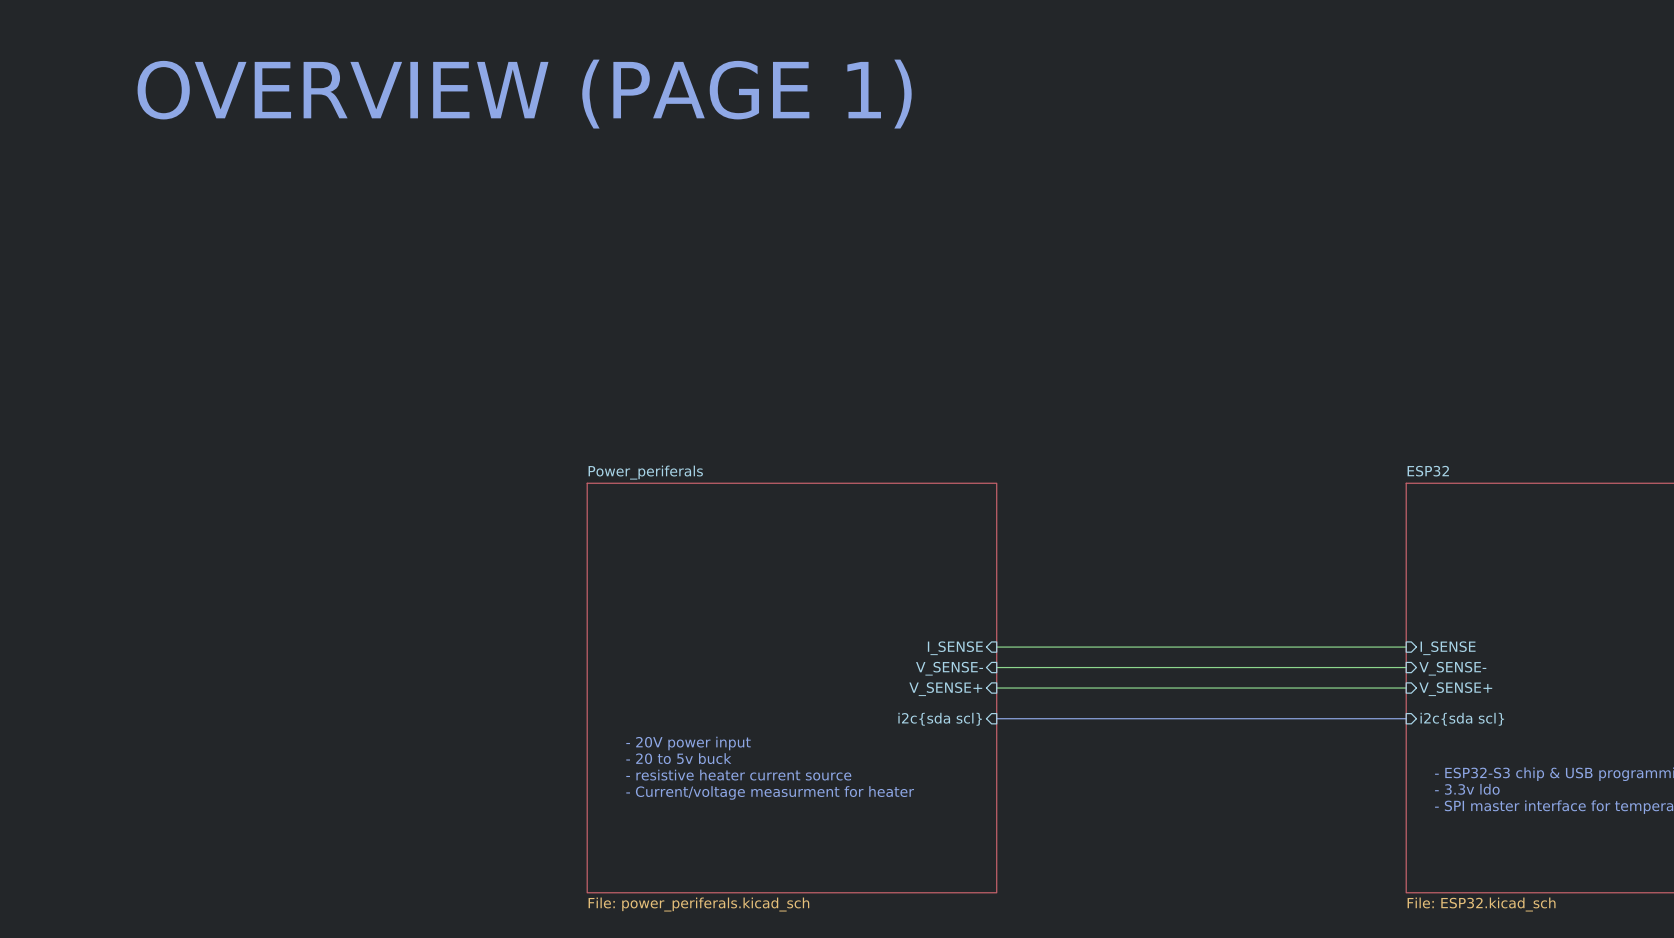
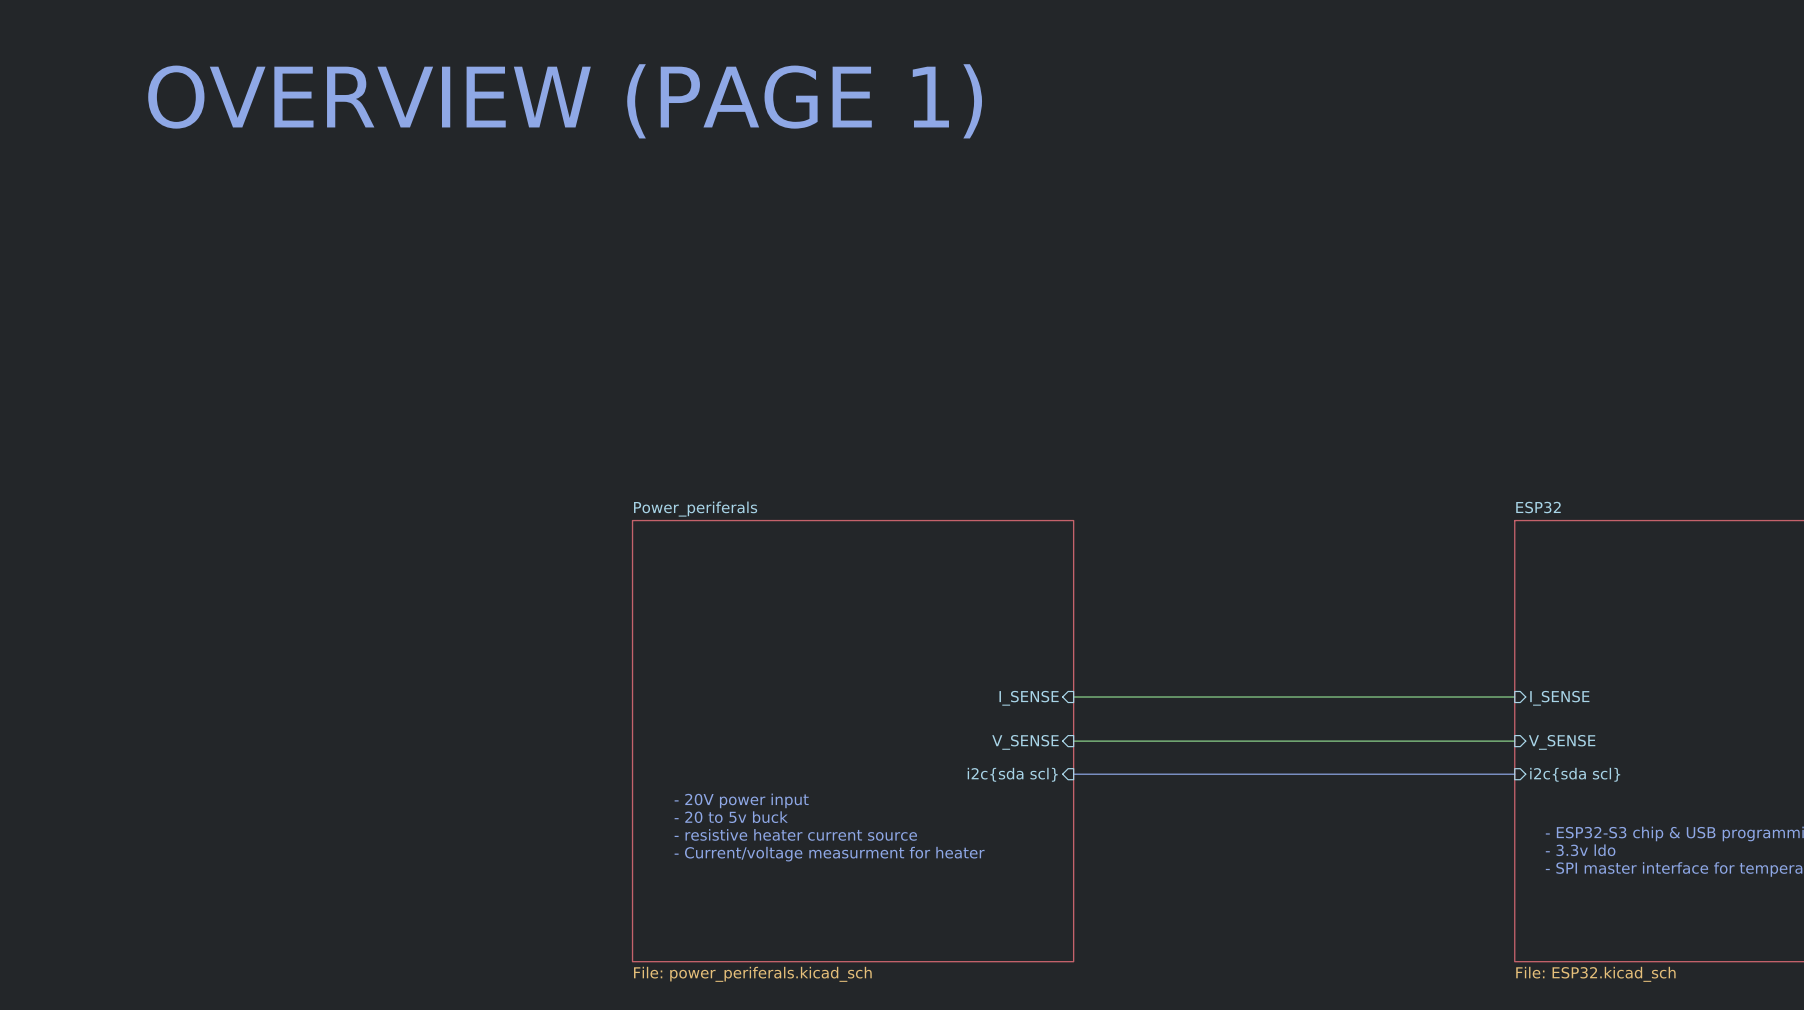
wire: (996, 667) (1406, 667) -> none
sheet pin: V_SENSE- (949, 668) -> none
sheet pin: V_SENSE- (1452, 668) -> none
sheet pin: V_SENSE+ (945, 689) -> V_SENSE (1025, 742)
sheet pin: V_SENSE+ (1455, 689) -> V_SENSE (1562, 742)

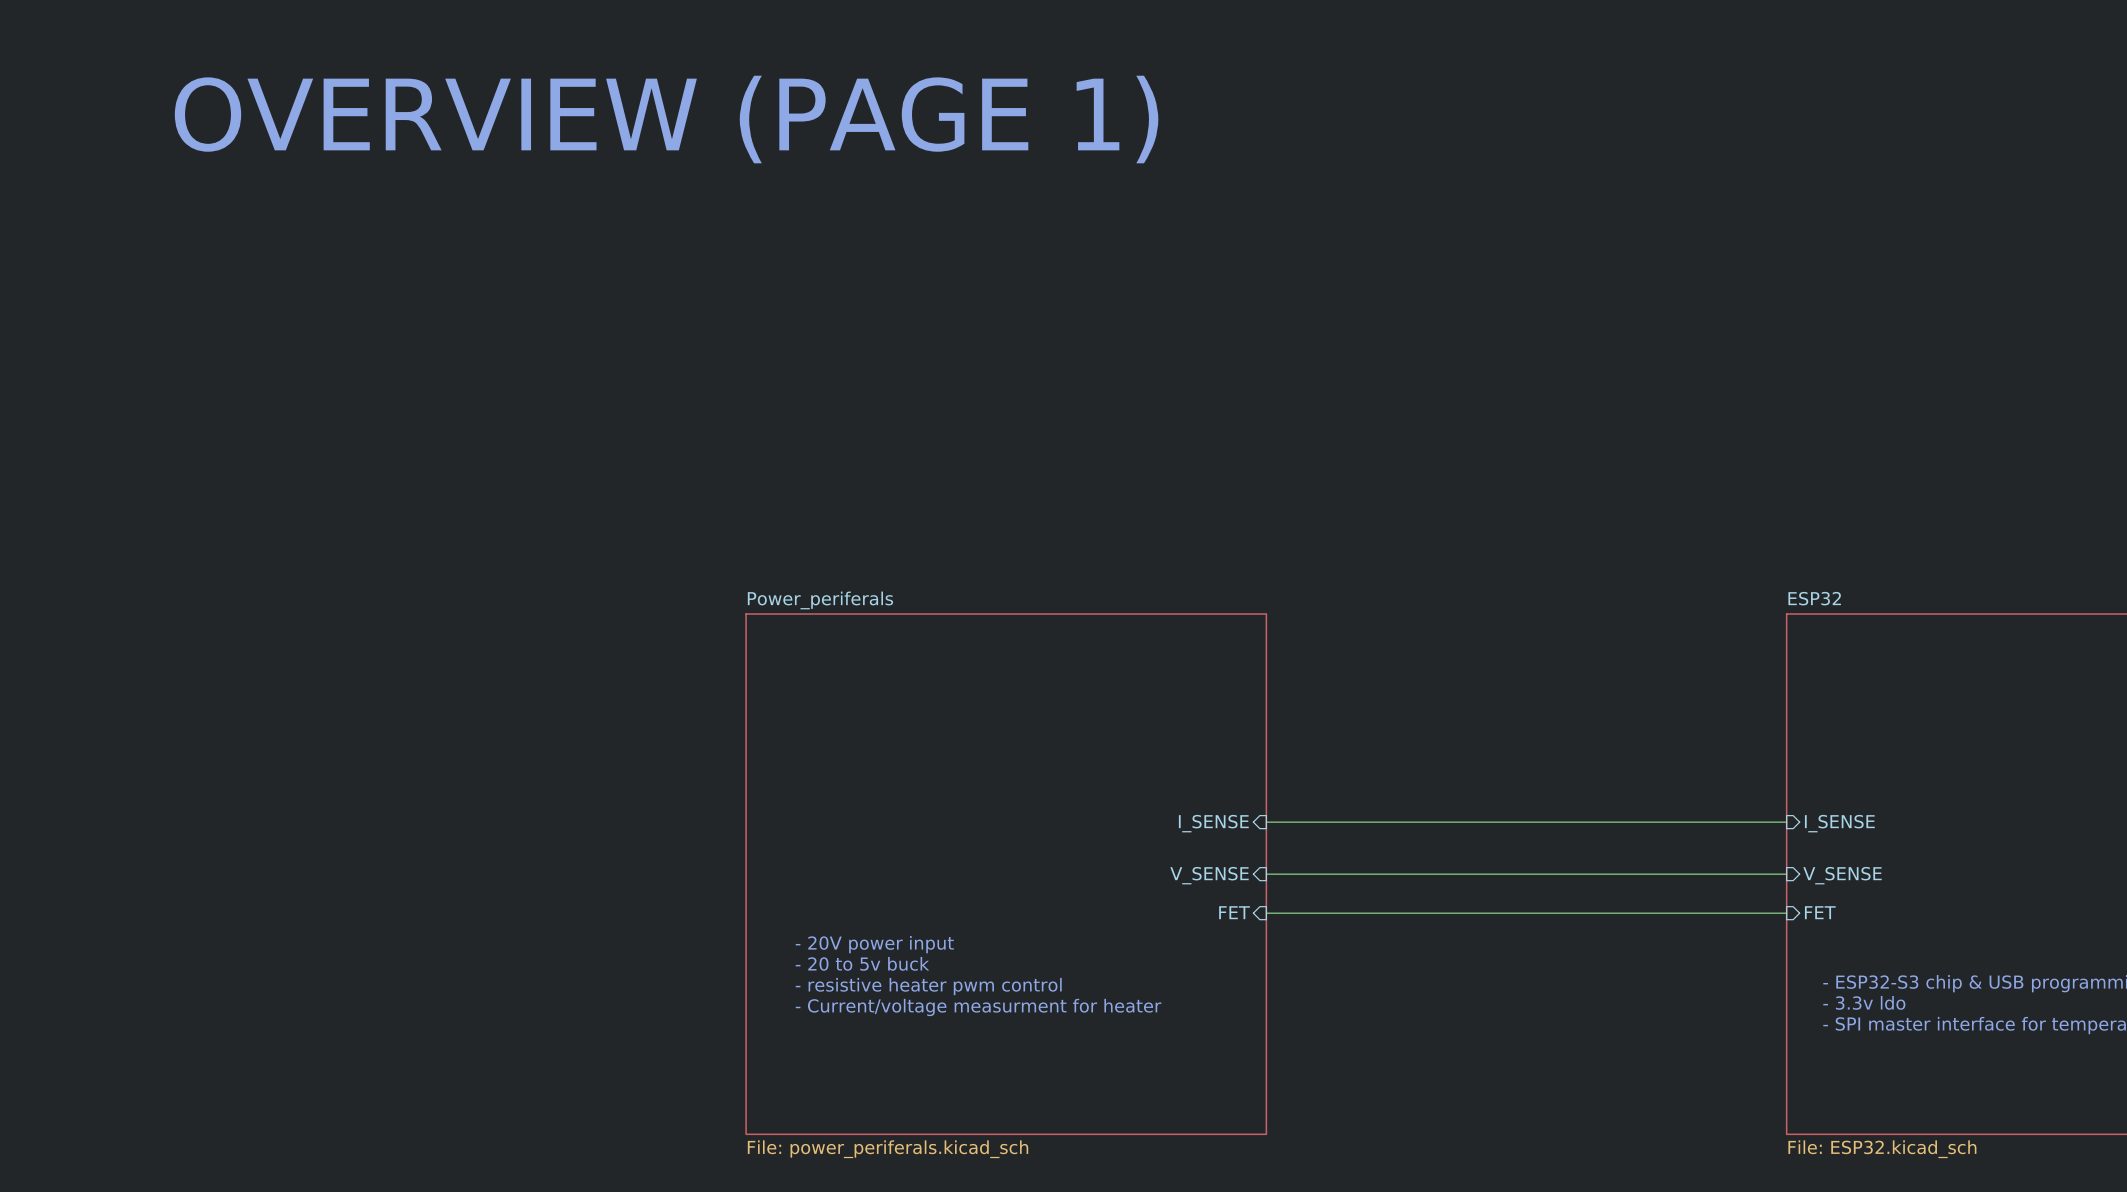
sheet pin: i2c{sda scl} (1012, 774) -> FET (1234, 912)
bus: (1073, 774) (1514, 774) -> none
sheet pin: i2c{sda scl} (1575, 774) -> FET (1820, 912)
text: - resistive heater current source (795, 834) -> - resistive heater pwm control (928, 986)

